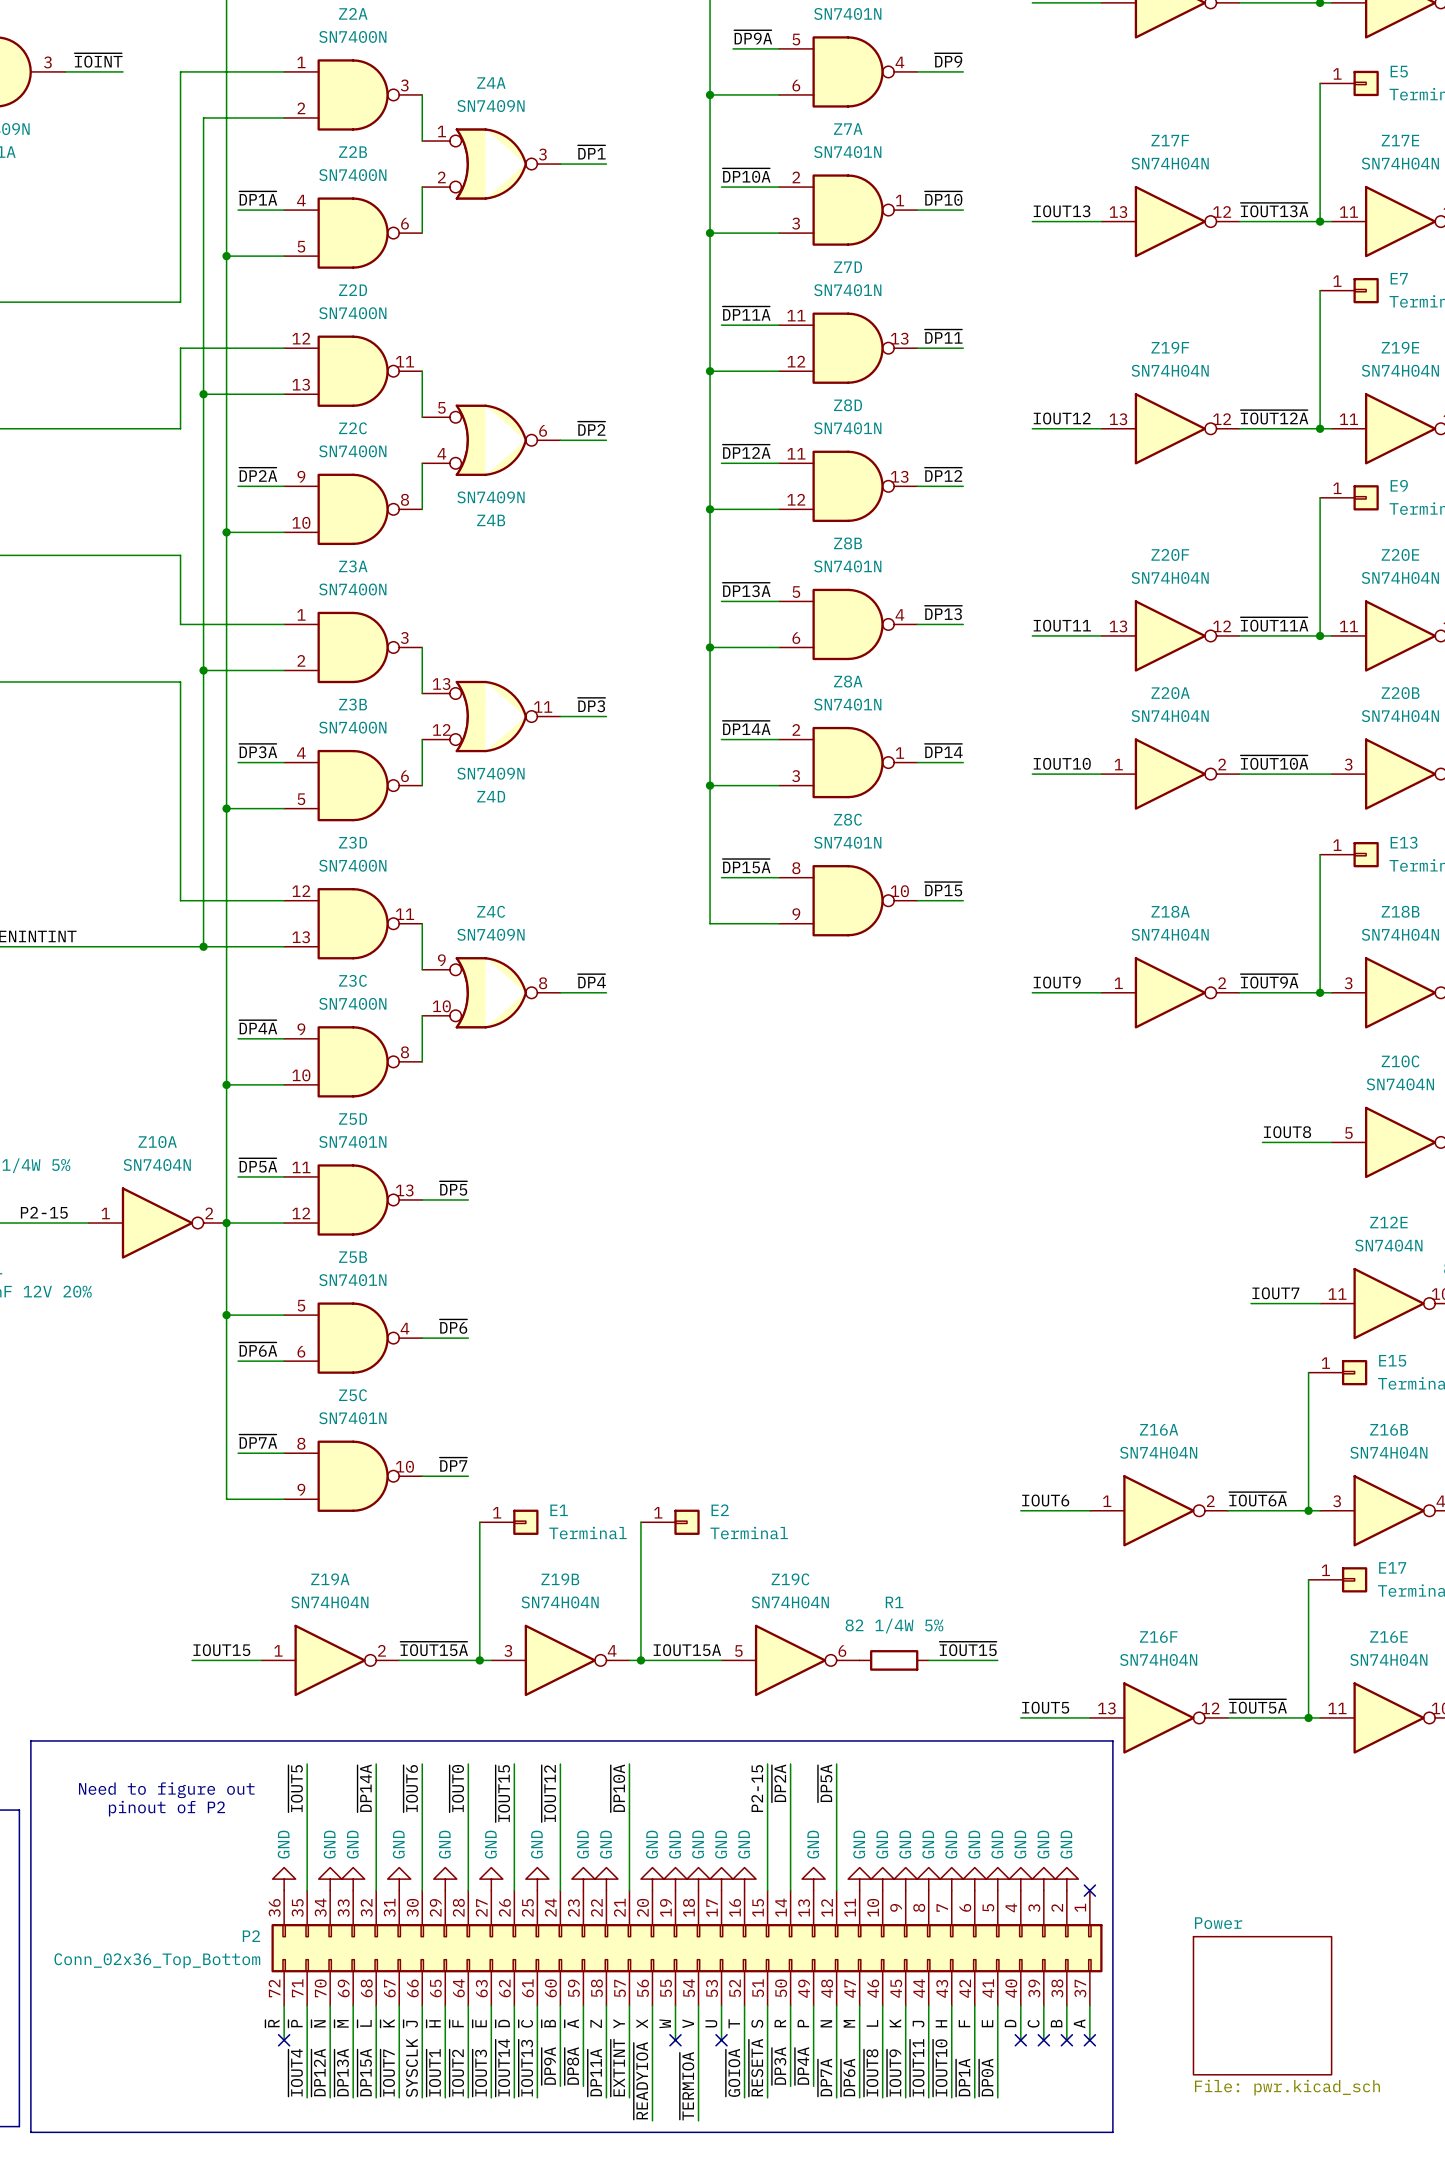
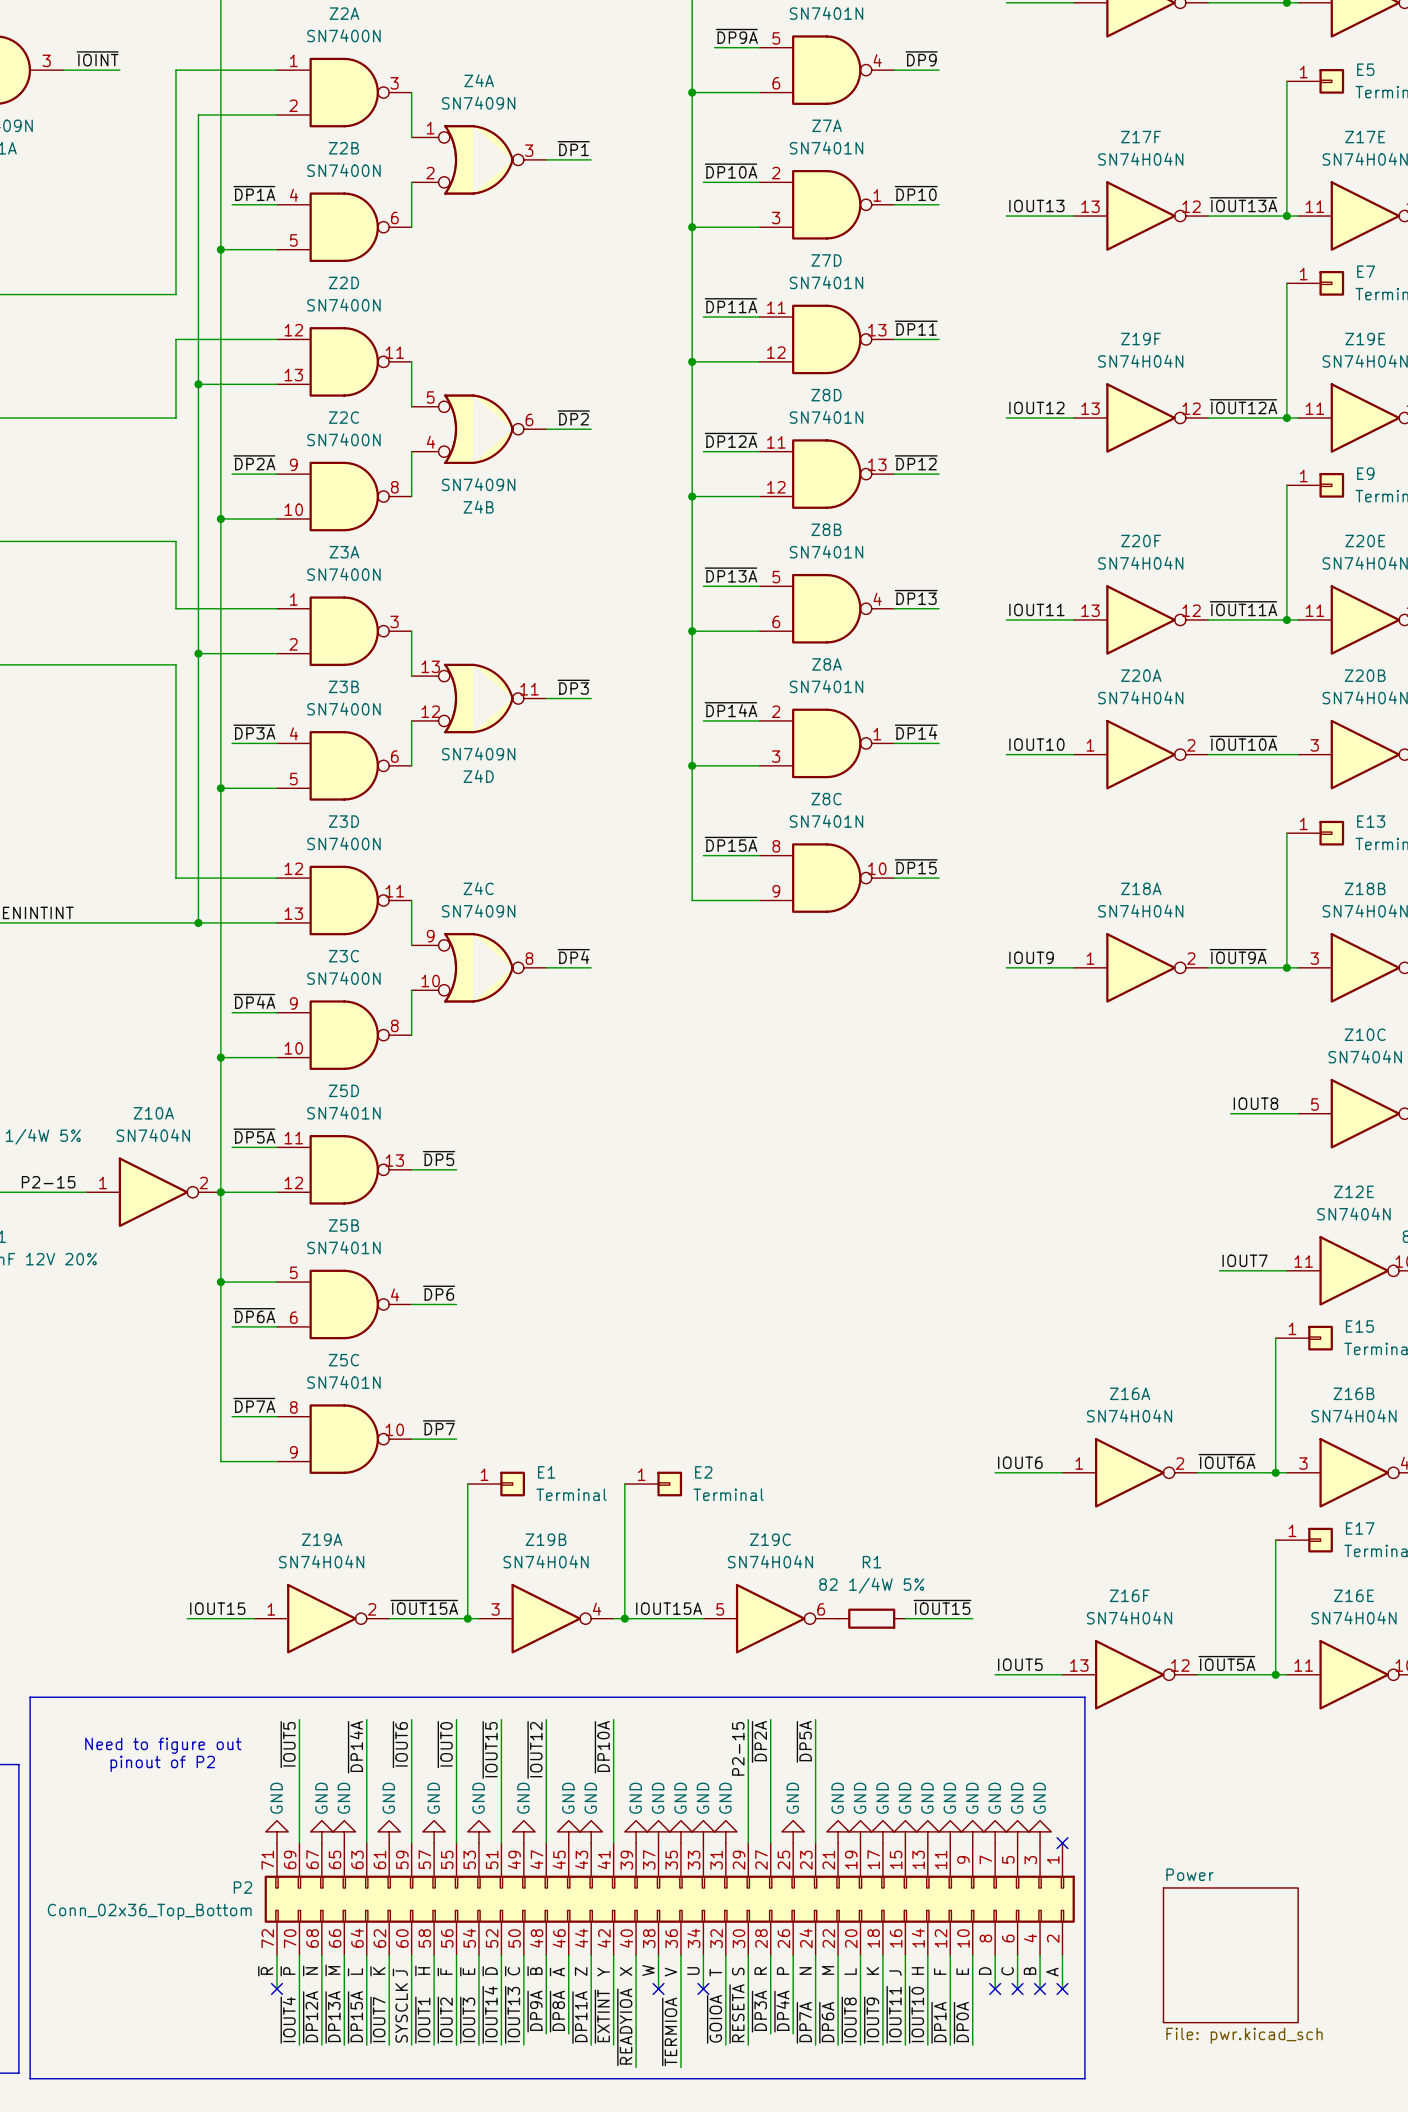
P2 symbol: [271, 1890, 1103, 2006] -> [264, 1843, 1075, 1956]

